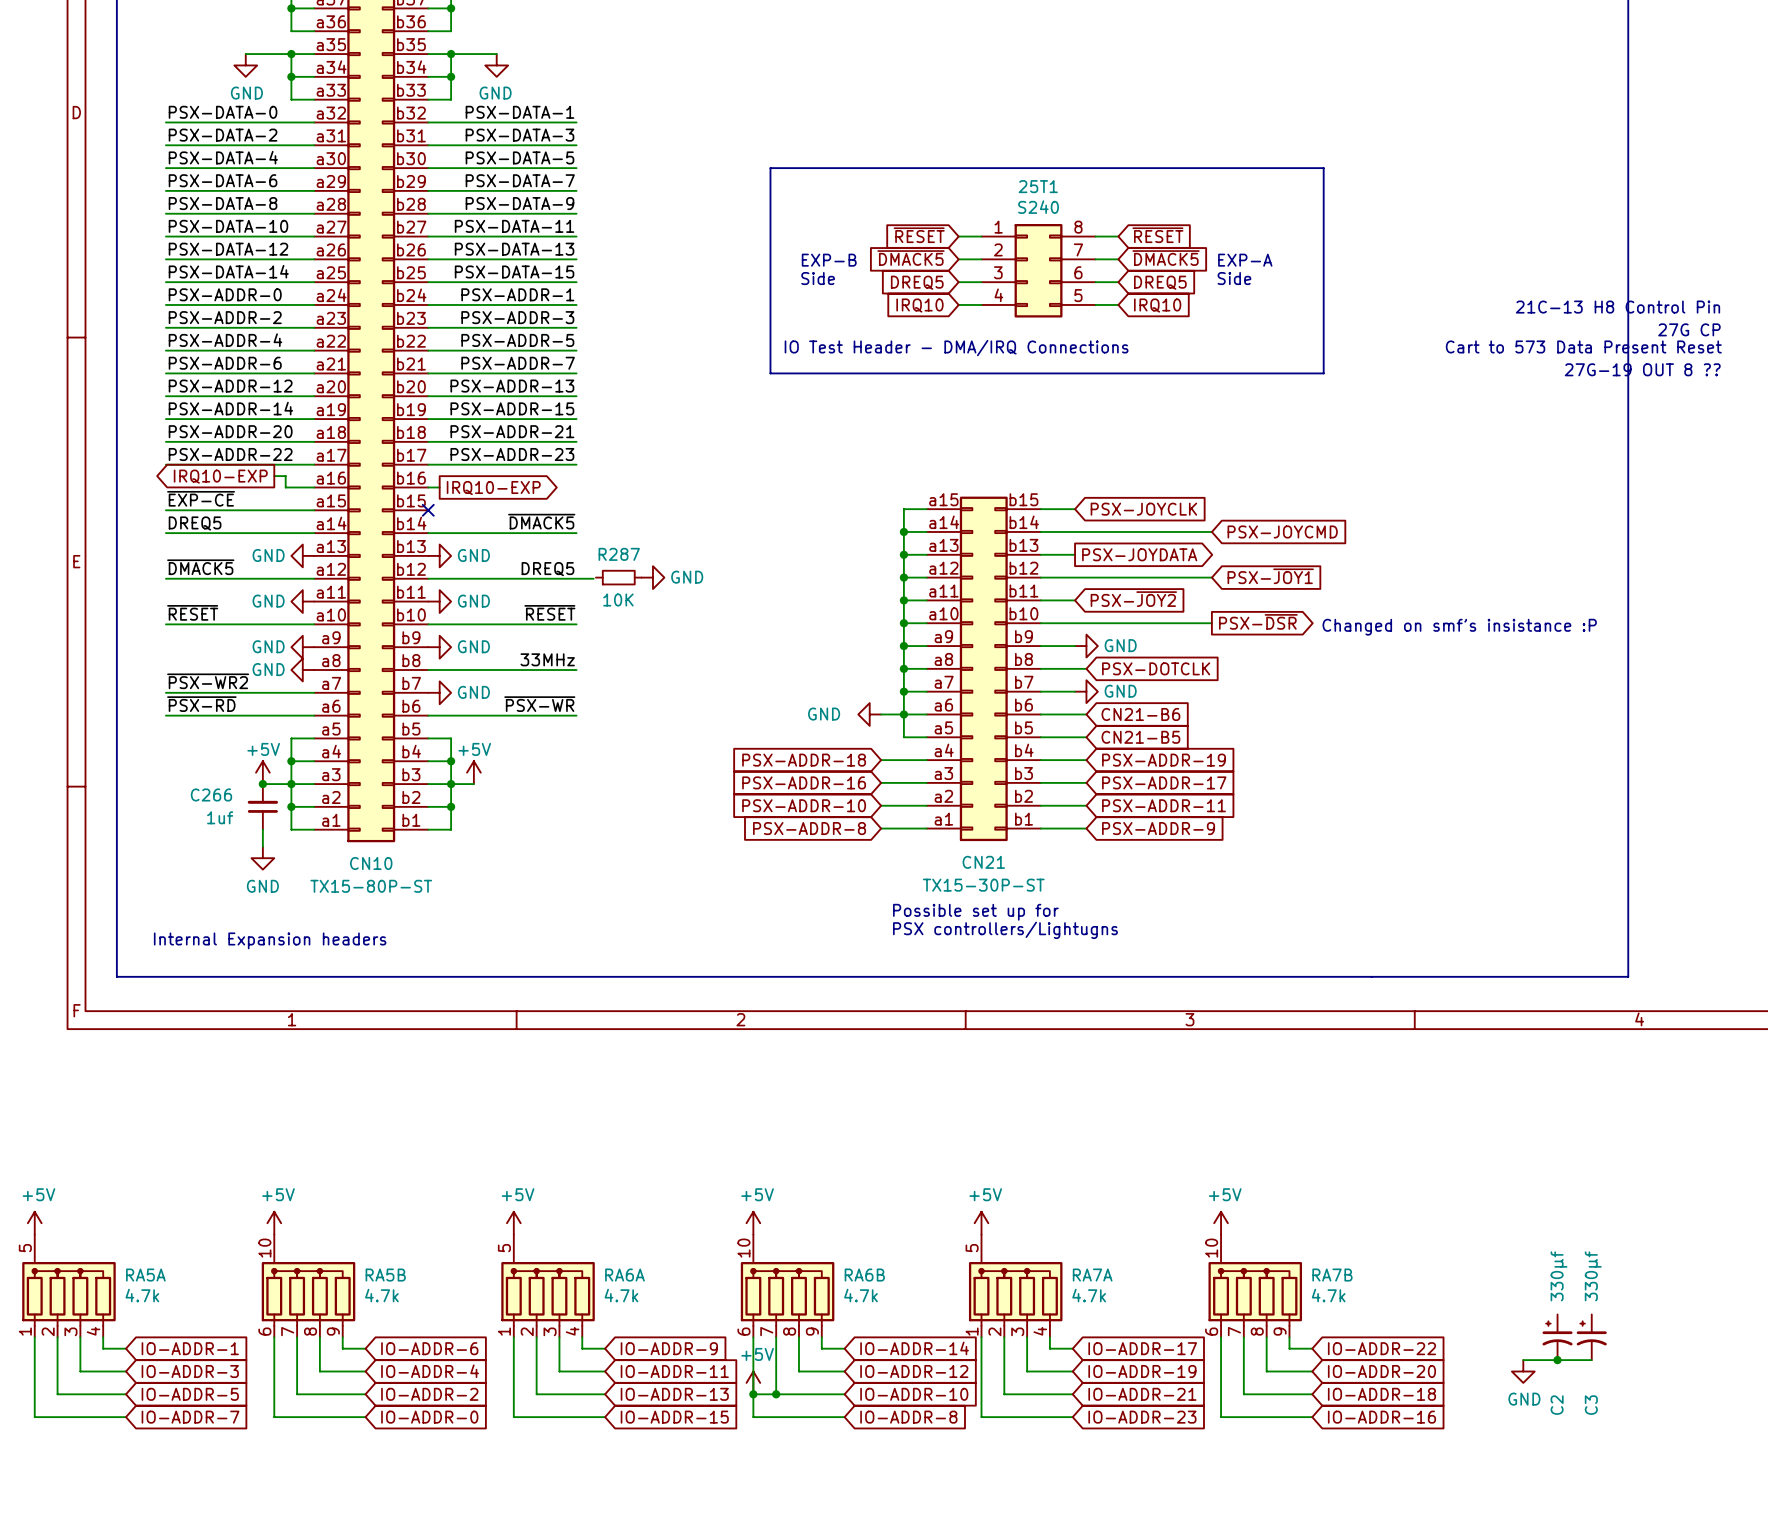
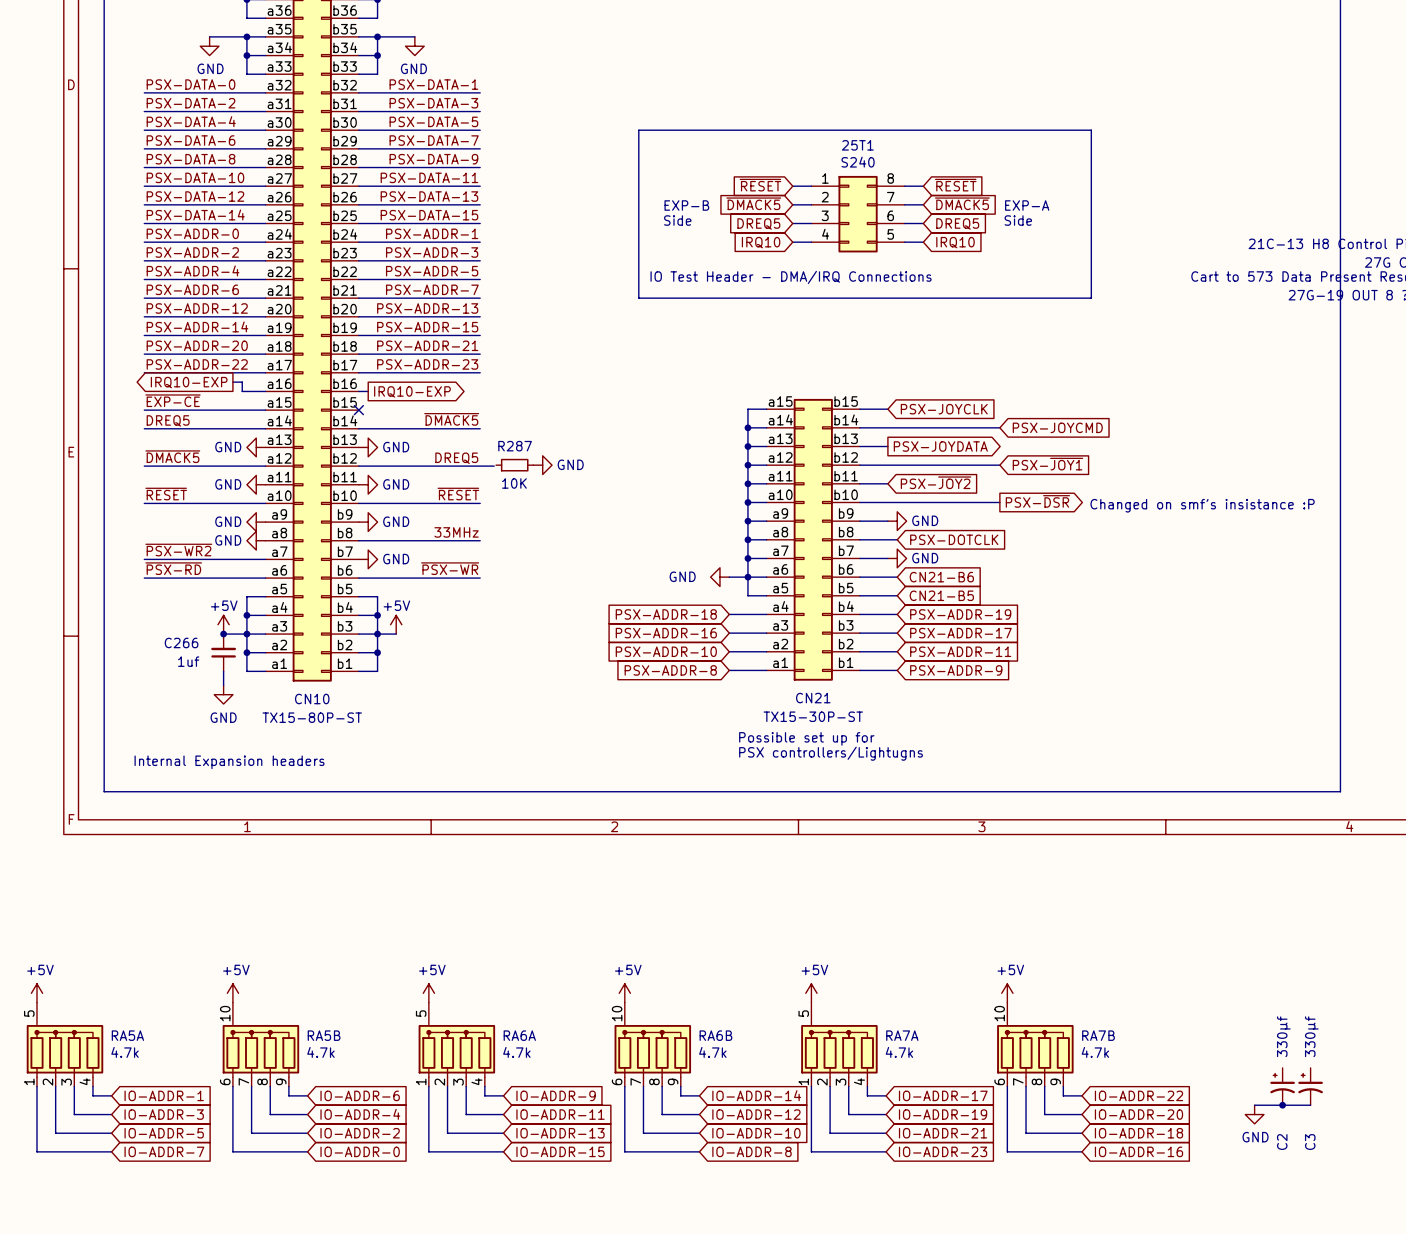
power symbol: +5V (753, 1382) -> none
wire: (753, 1394) (776, 1394) -> none
junction: (753, 1394) -> none
junction: (776, 1394) -> none

